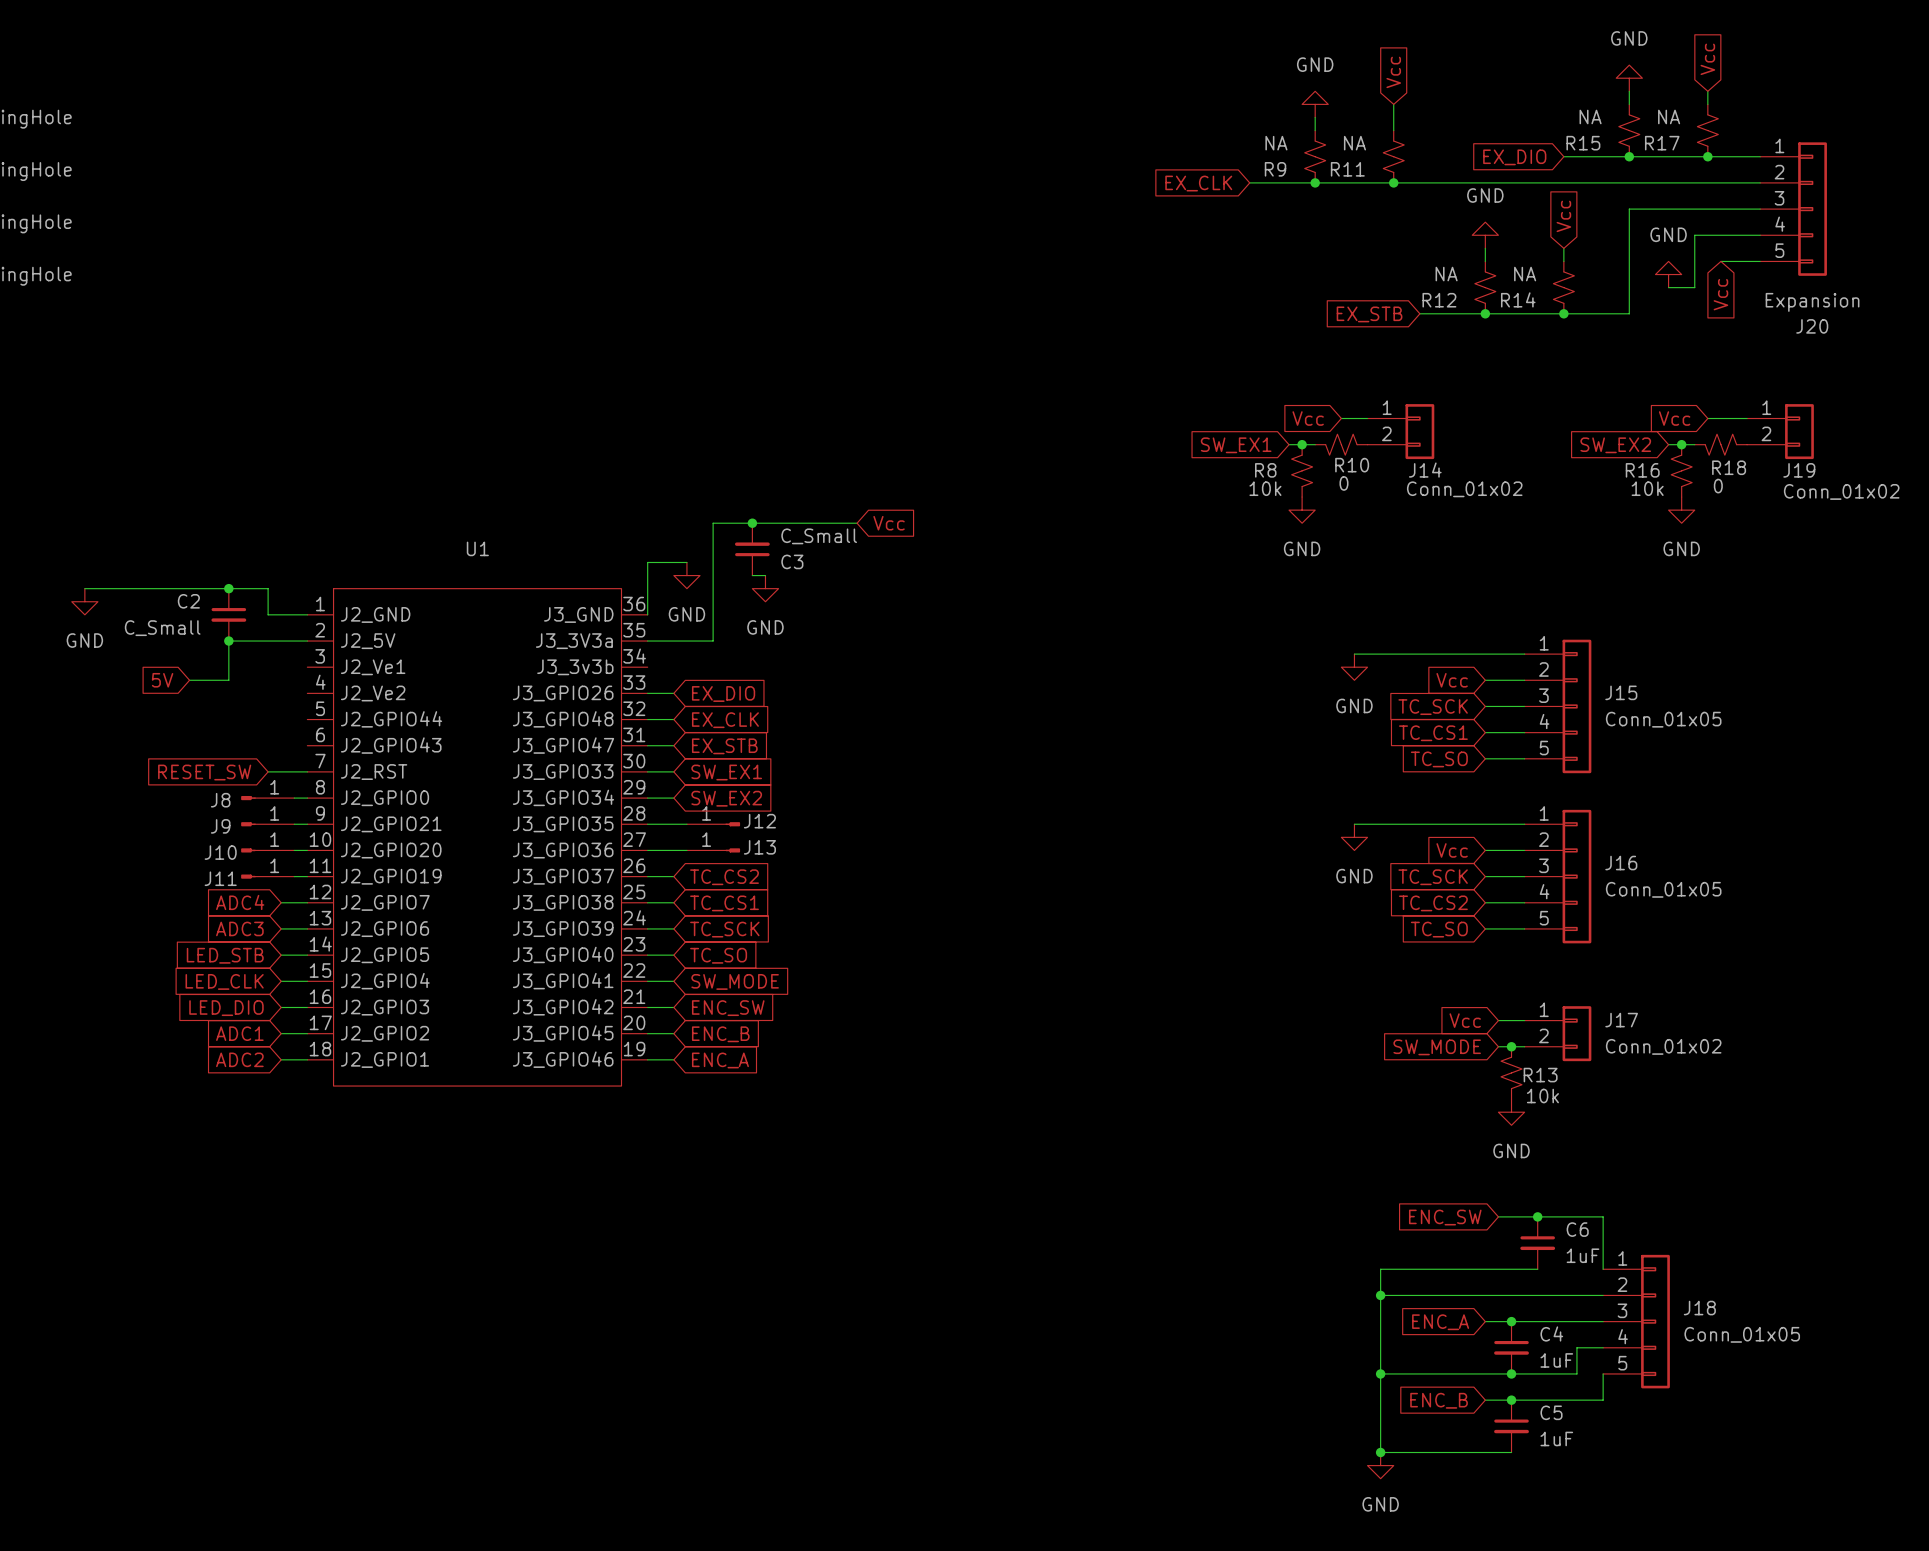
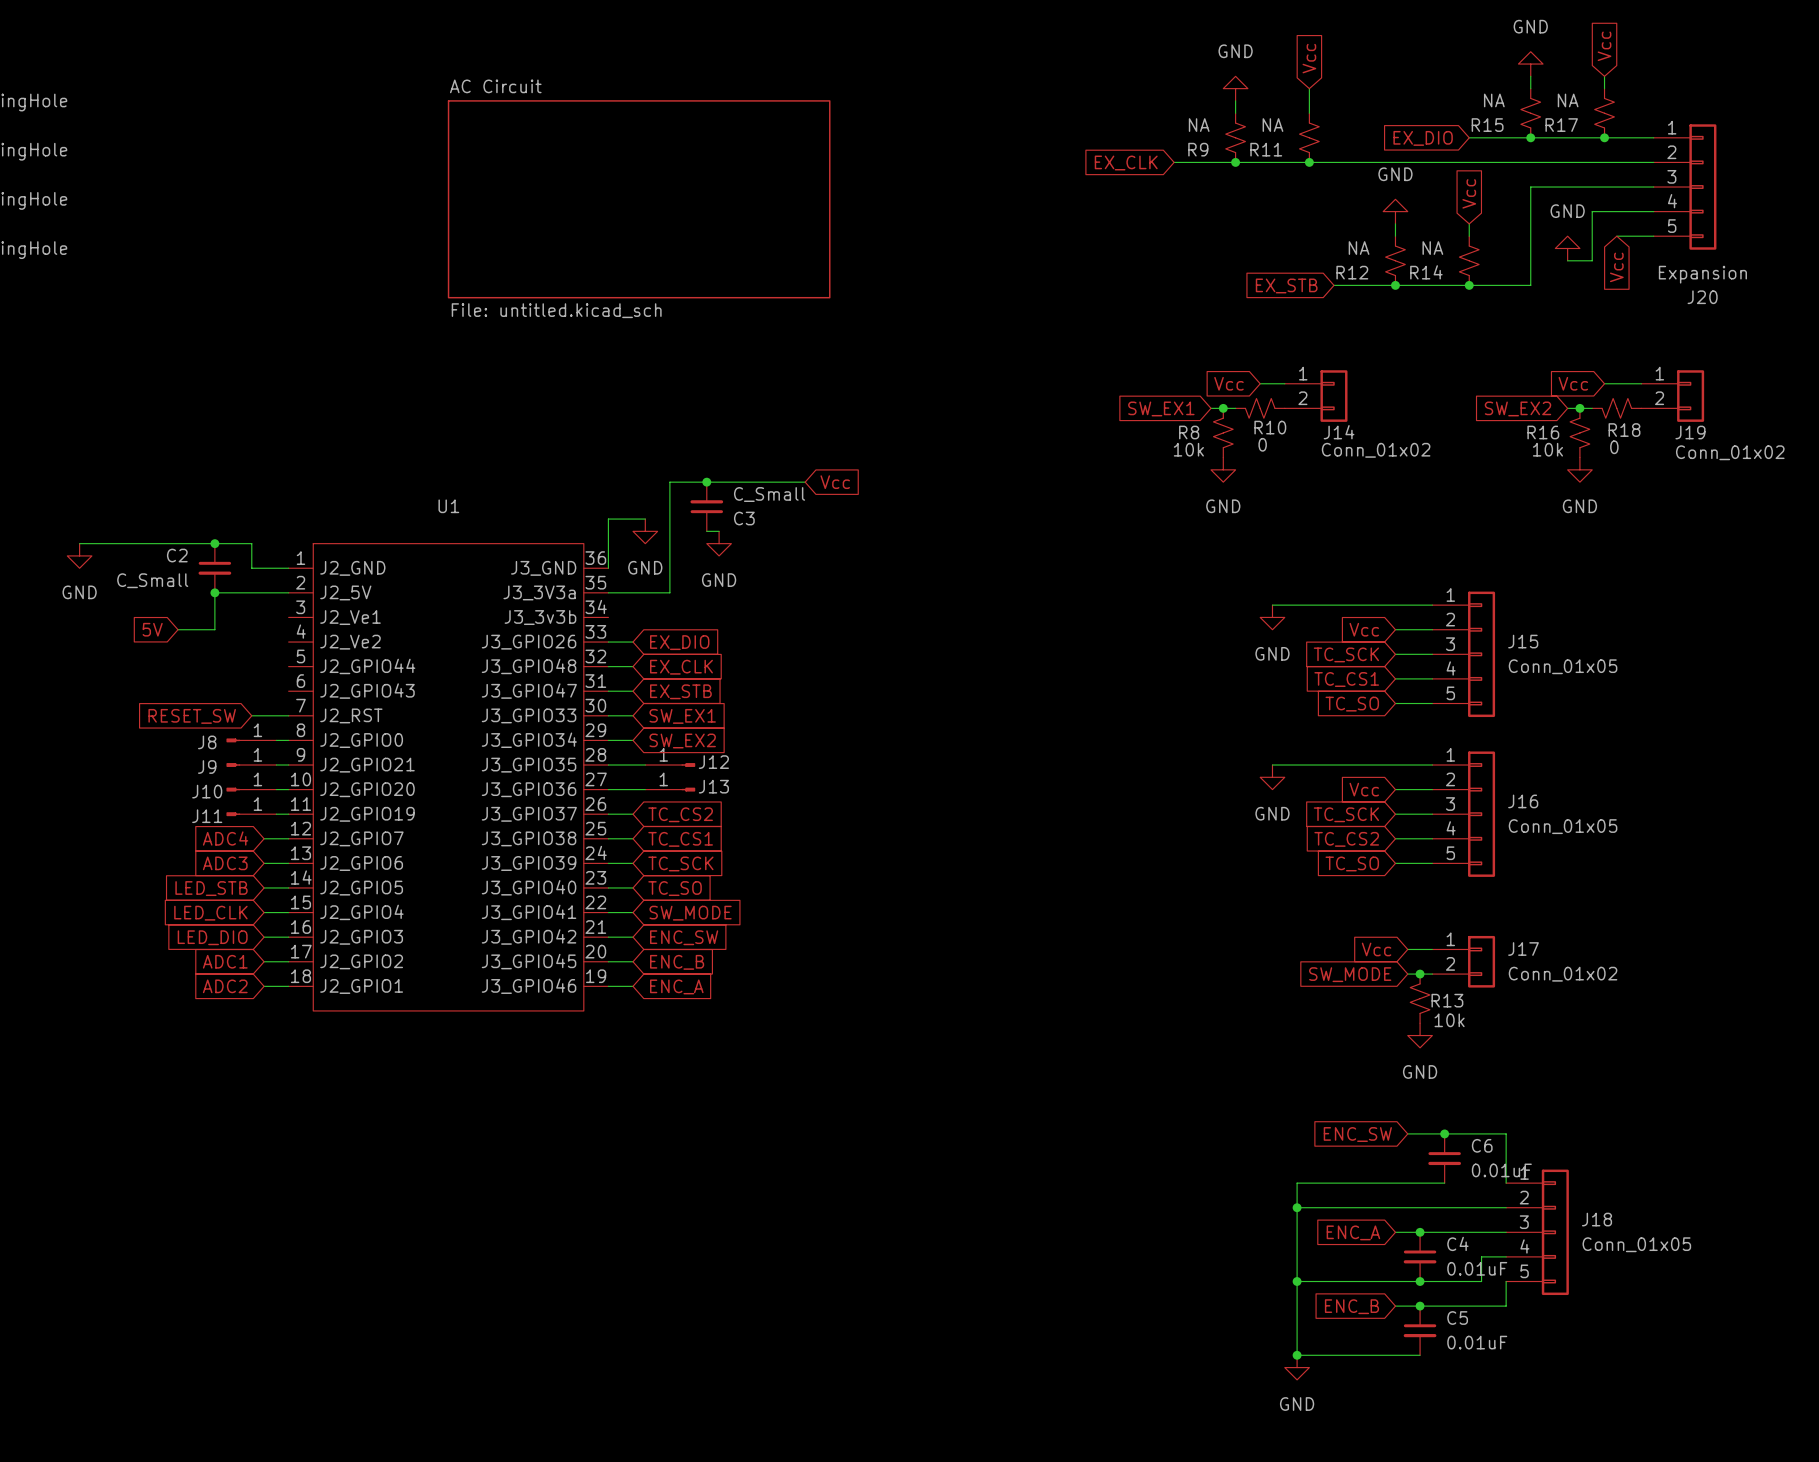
sheet AC Circuit: none -> File: untitled.kicad_sch (639, 199)
C6 value: 1uF (1582, 1255) -> 0.01uF (1501, 1170)
C4 value: 1uF (1556, 1360) -> 0.01uF (1477, 1268)
C5 value: 1uF (1556, 1438) -> 0.01uF (1477, 1342)

